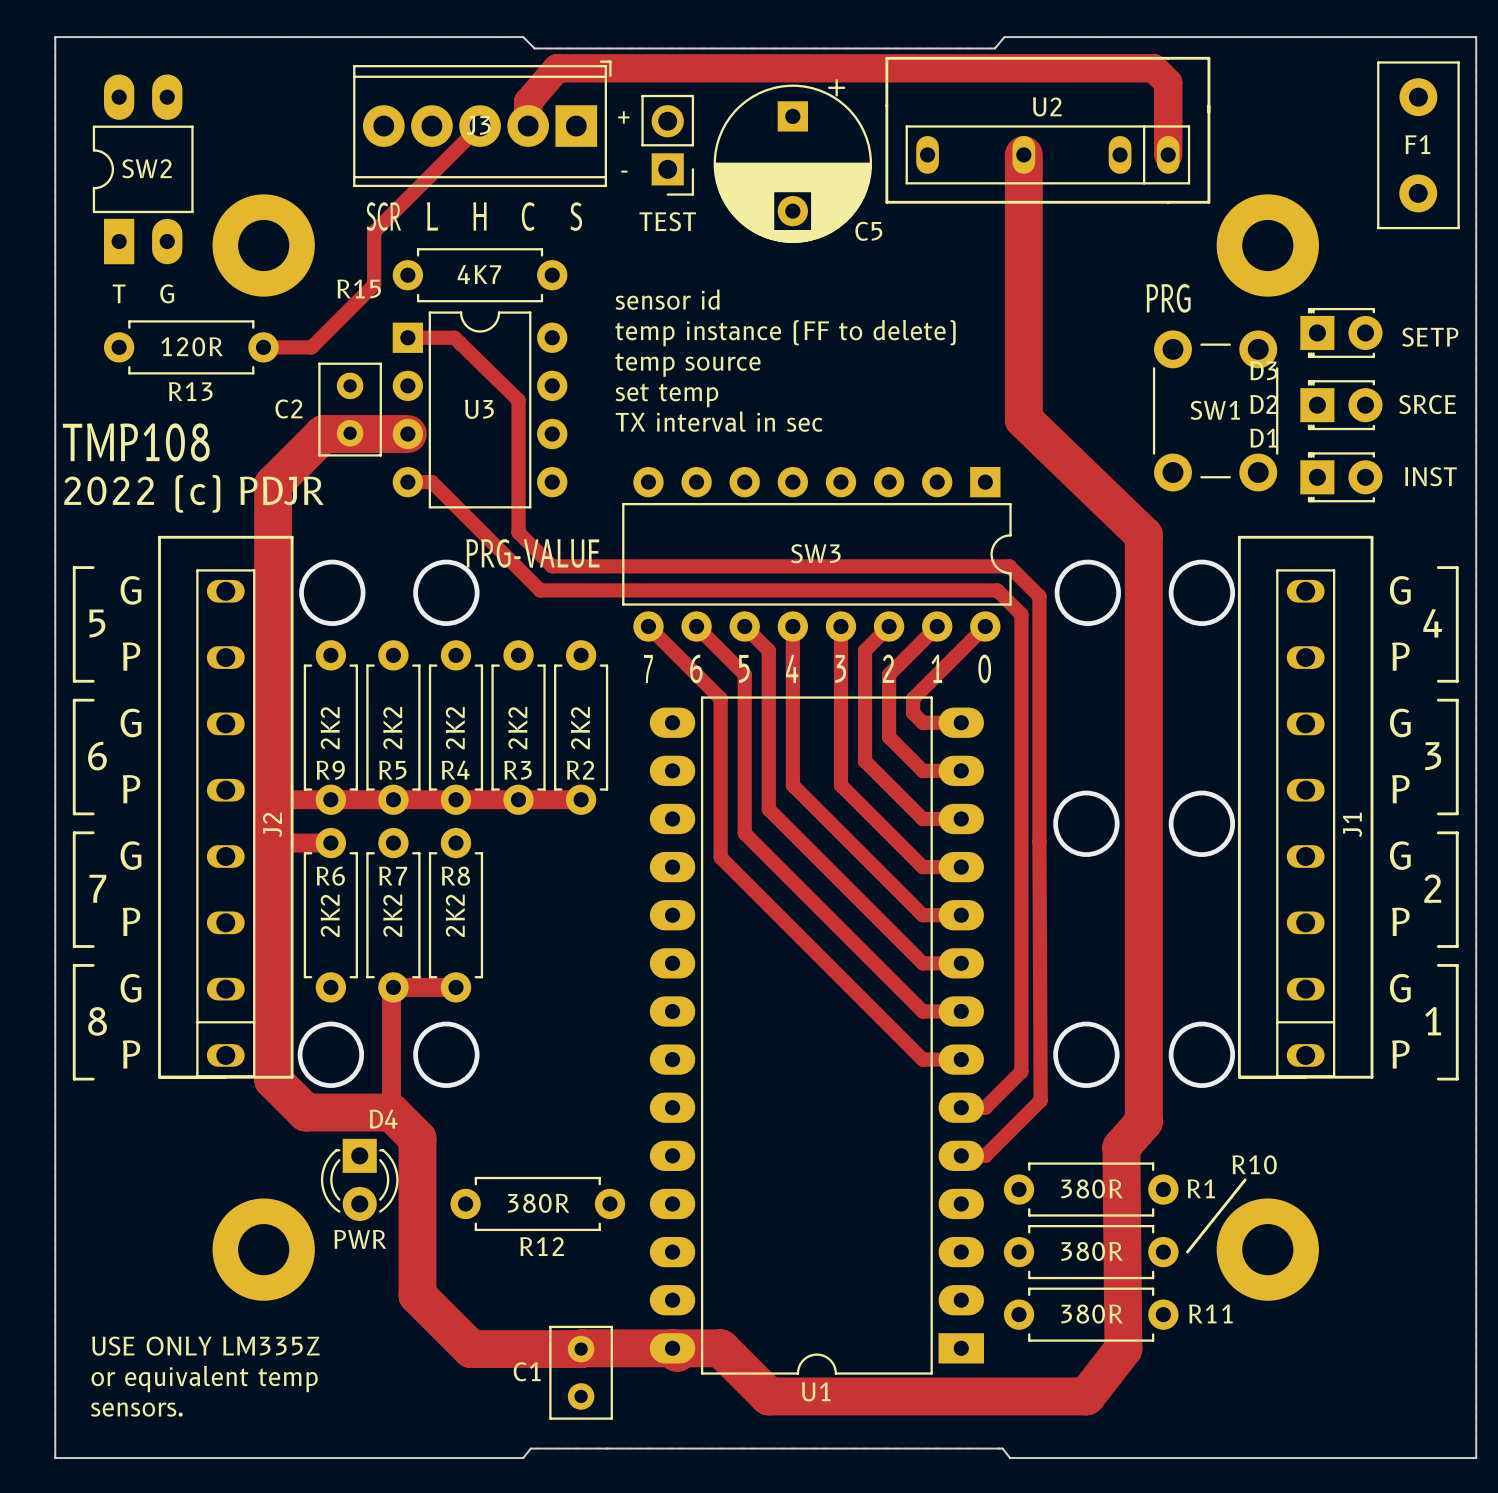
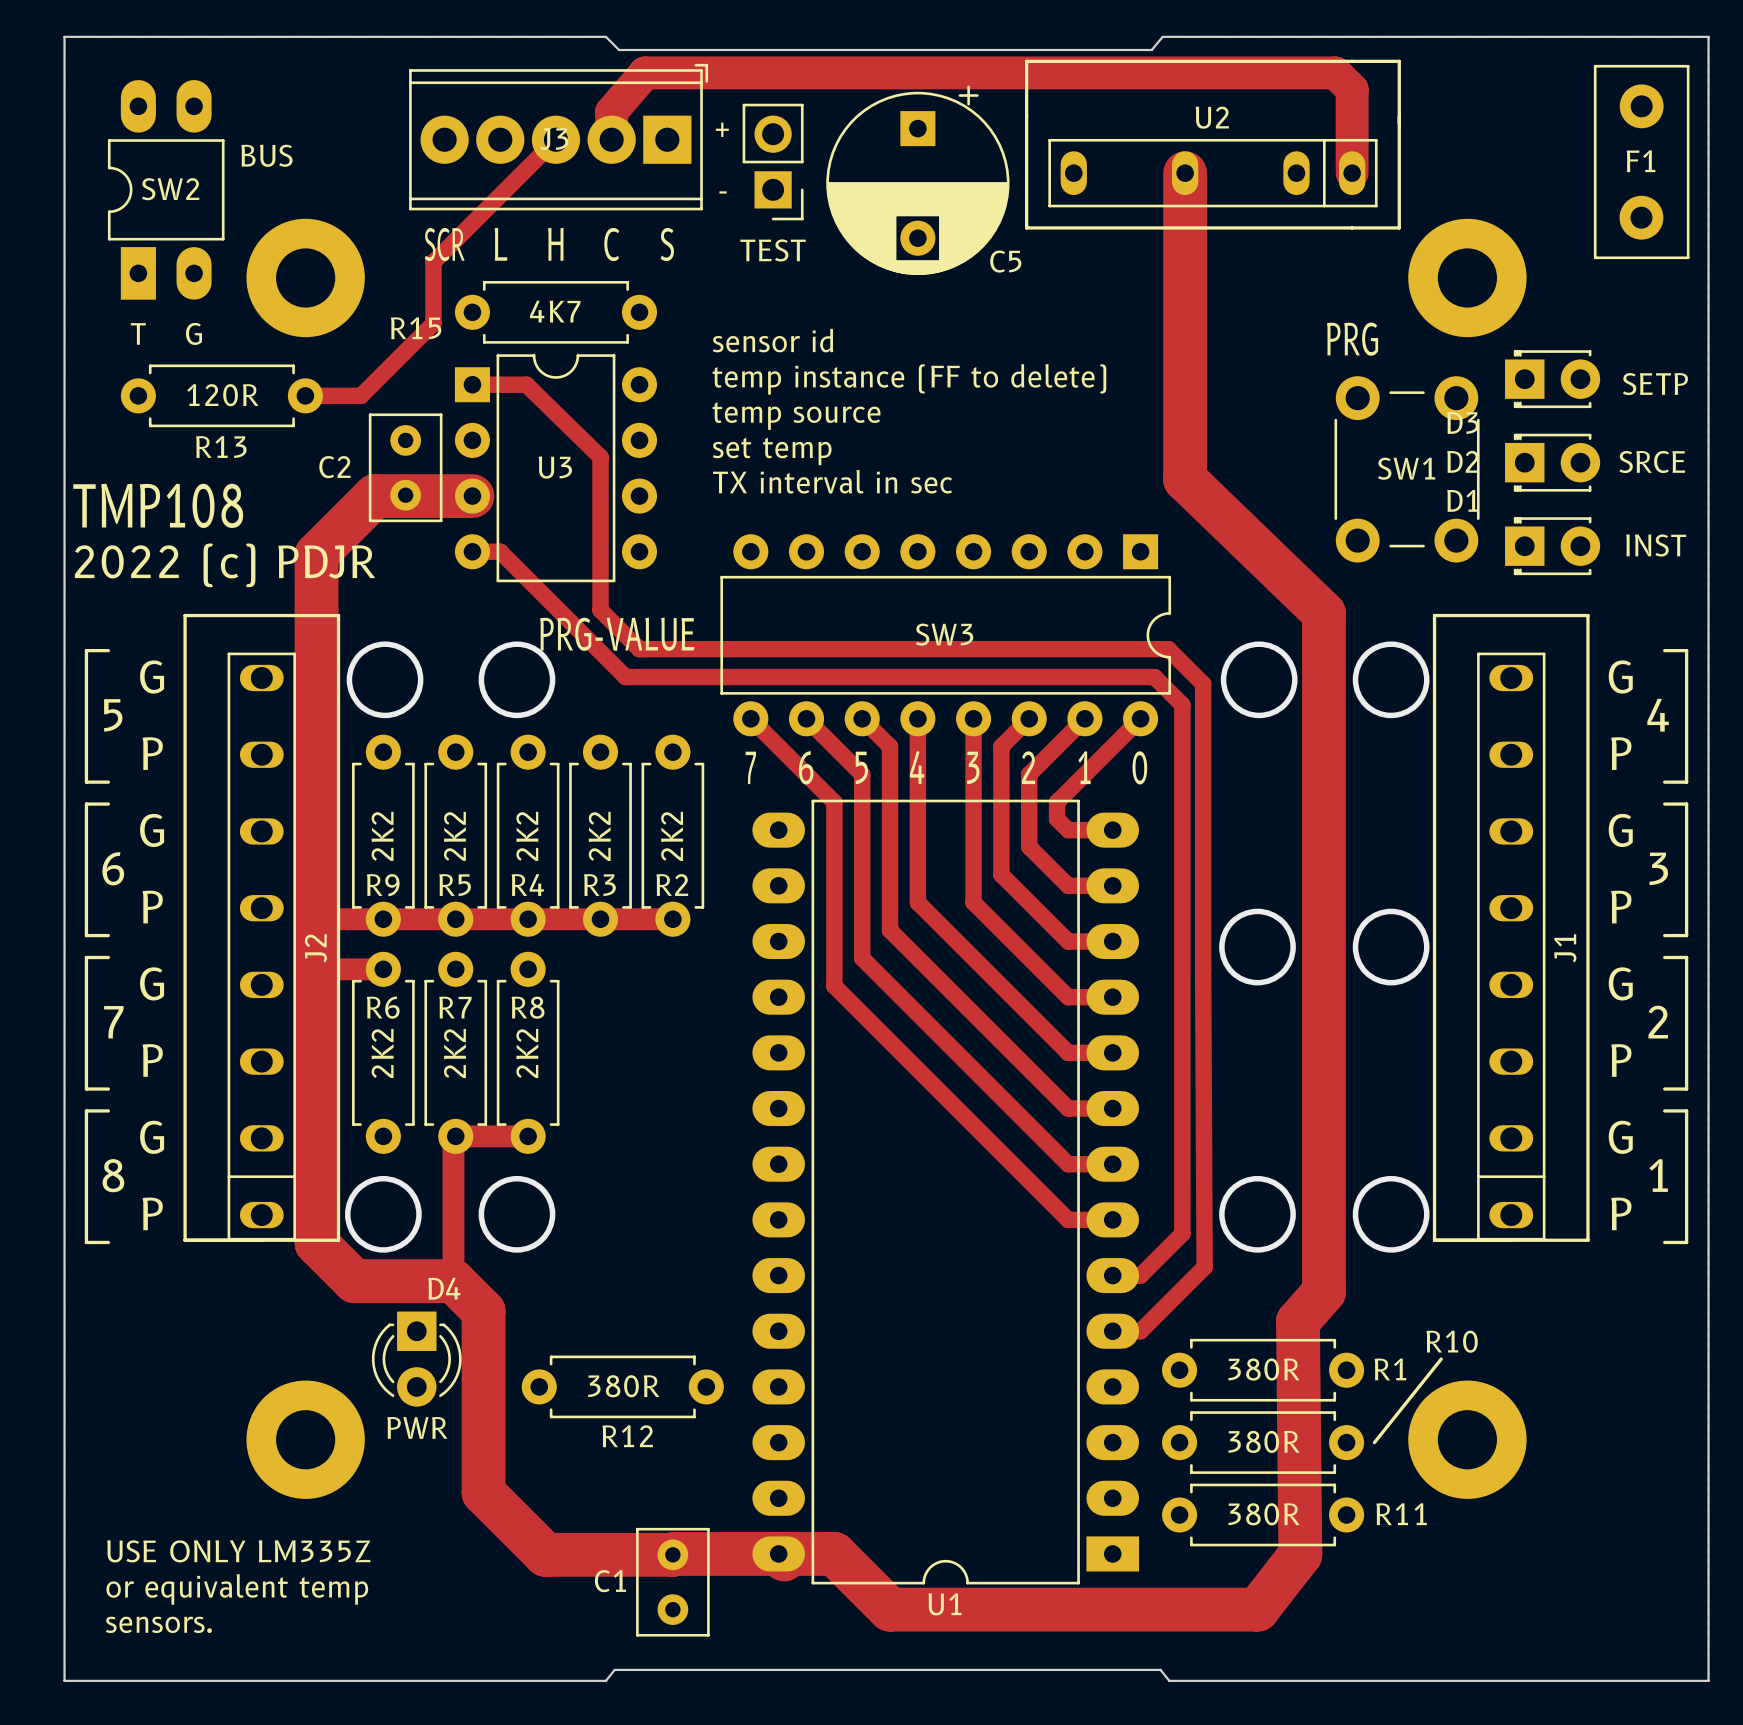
SW2 value: none -> BUS (266, 155)

